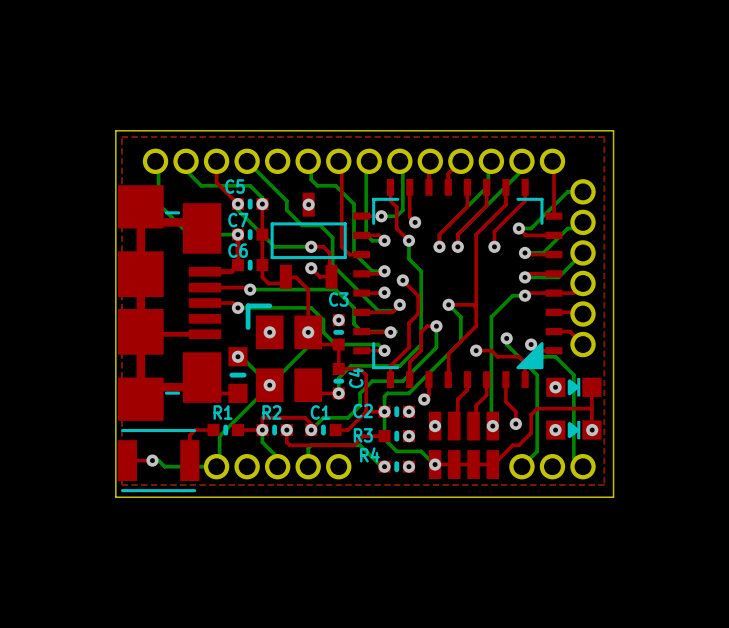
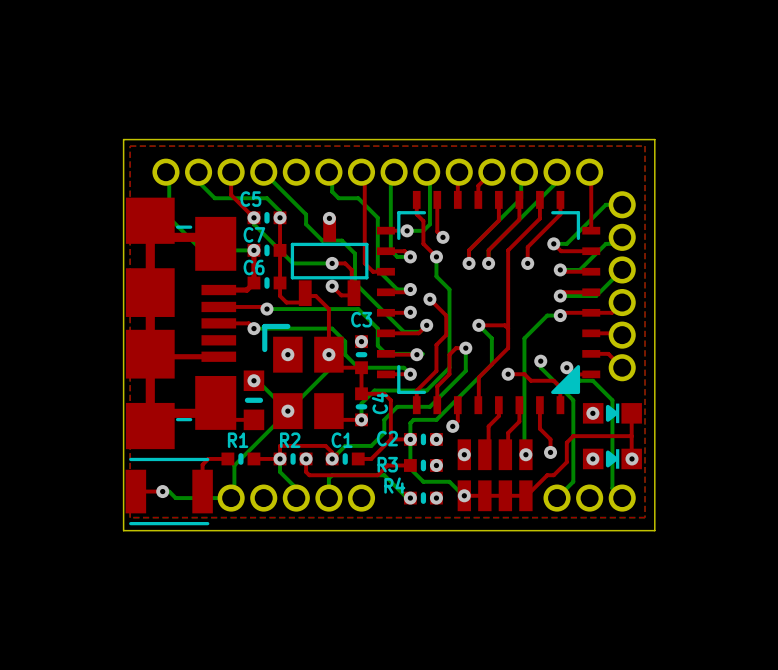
part footprint: [270, 192, 347, 289] -> [290, 216, 369, 306]

